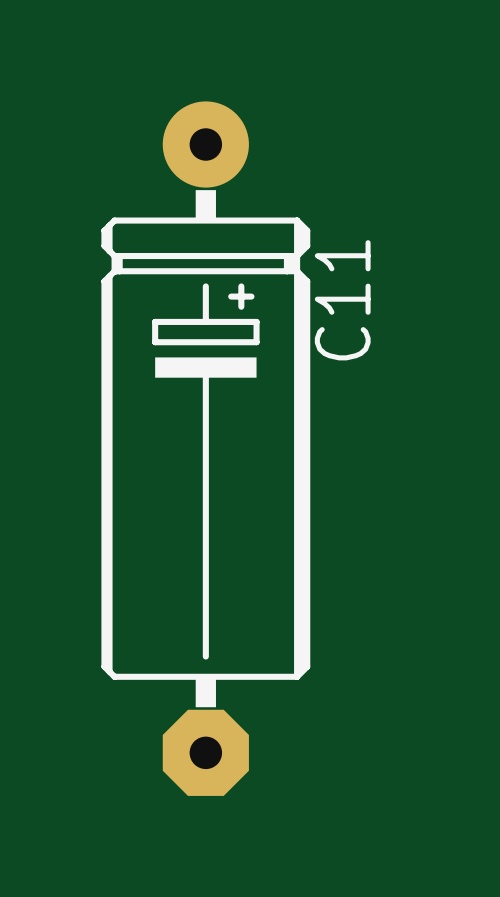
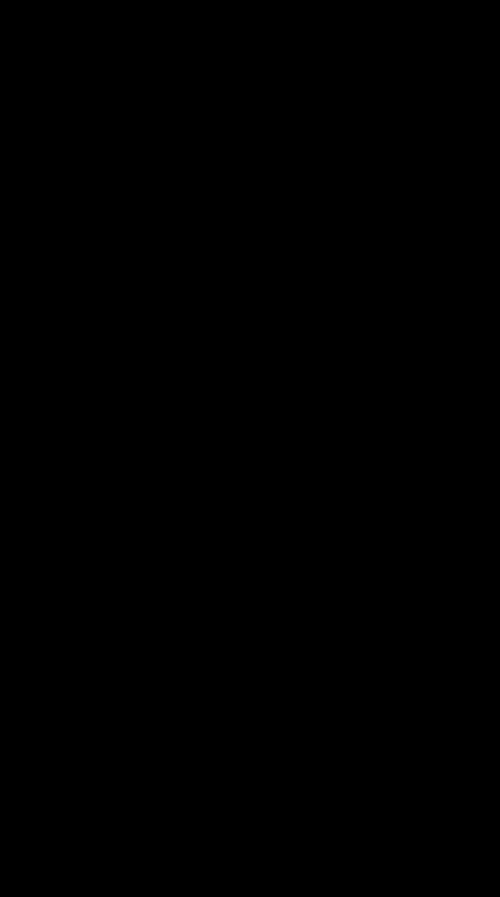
C11: (205, 448) -> none

